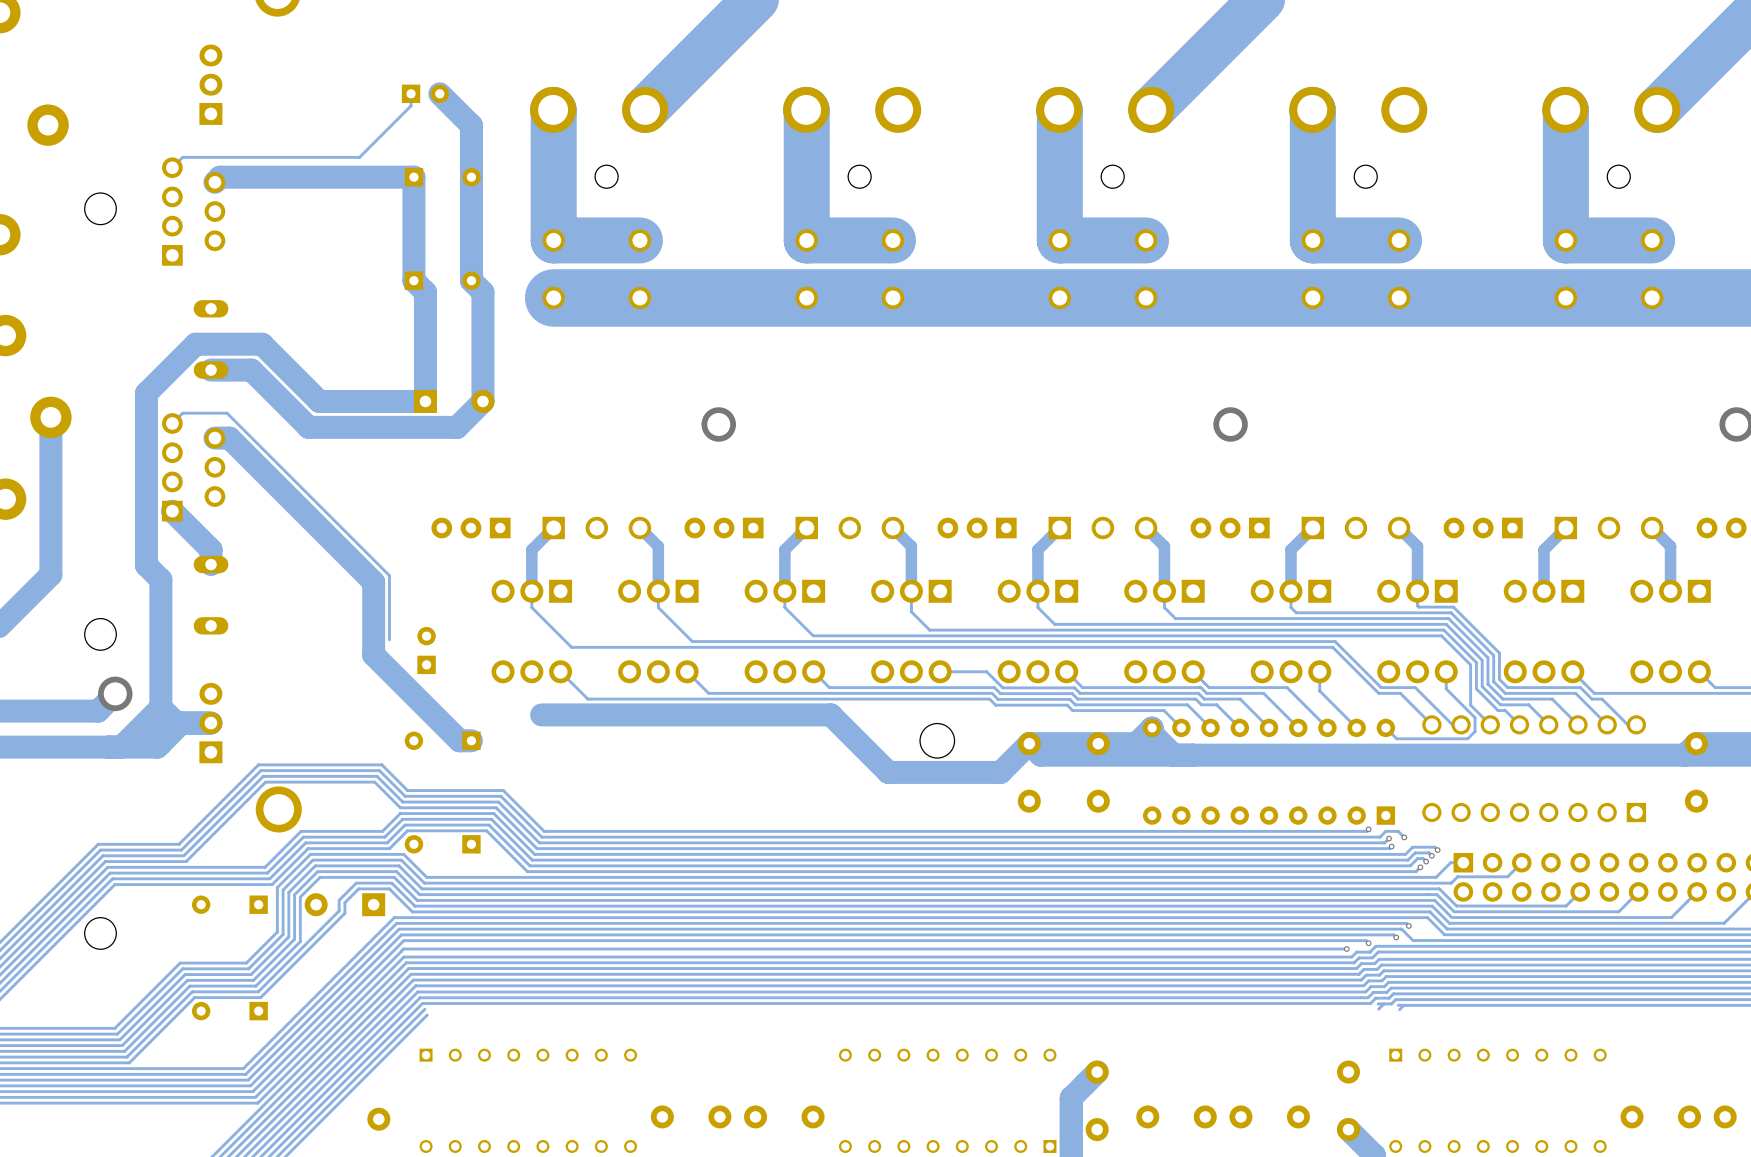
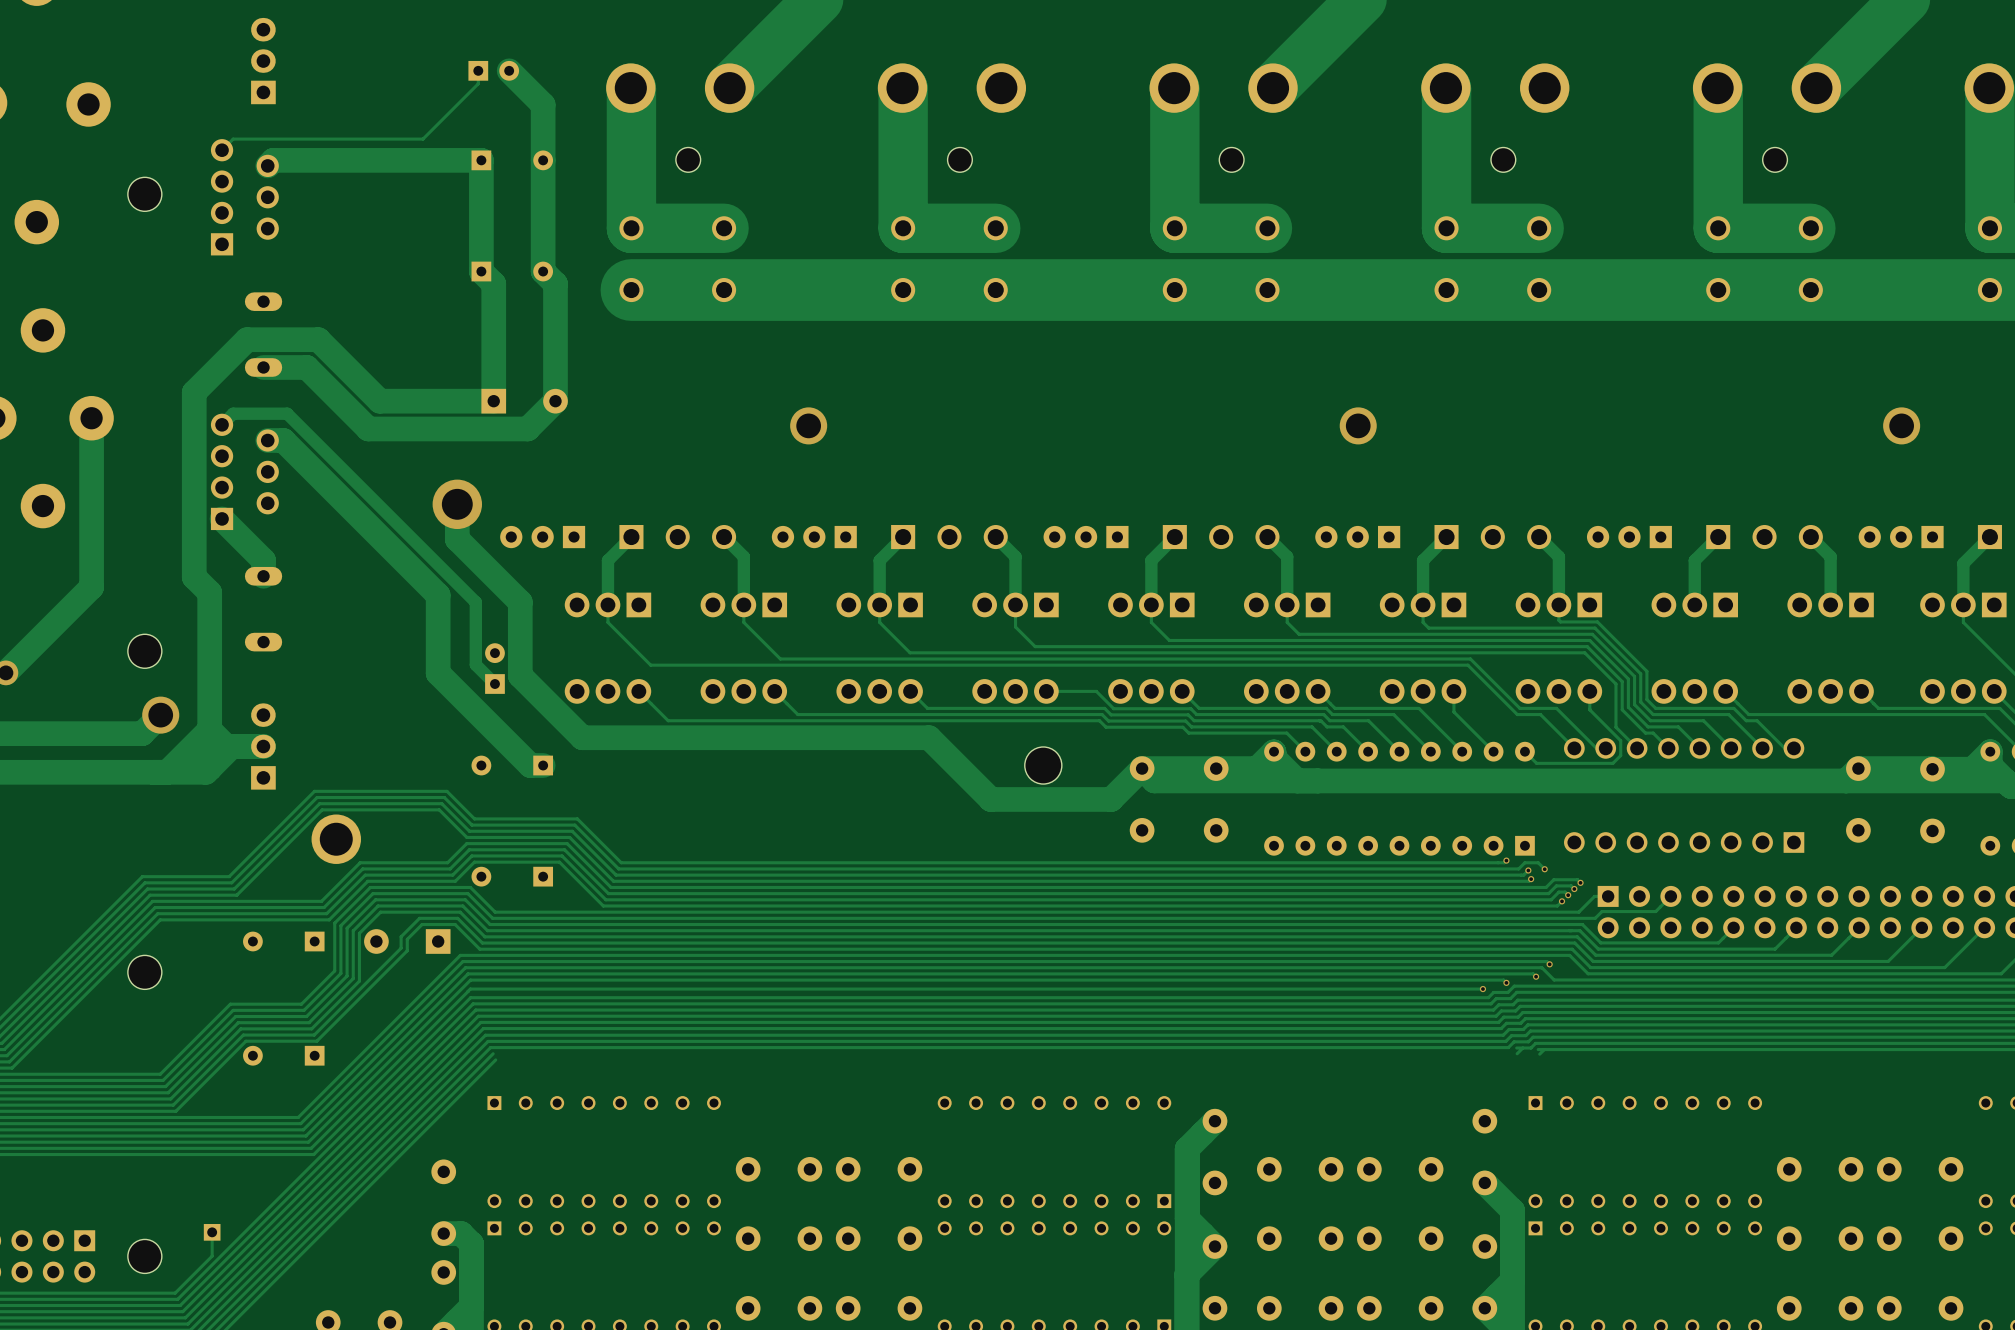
track: (226, 413) (389, 575) (389, 639) -> (280, 413) (287, 413) (475, 602) (475, 664) (494, 684)
track width: thin (226, 413) (182, 413) (172, 423) -> thick (280, 413) (233, 413) (222, 424)
track: none -> (457, 504) (457, 539) (520, 602) (520, 675) (582, 737) (618, 737)
via: none -> (457, 504)

